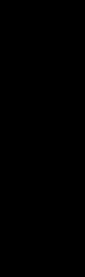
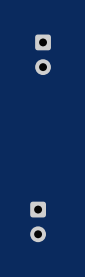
part: none -> (43, 54)
part: none -> (38, 221)

